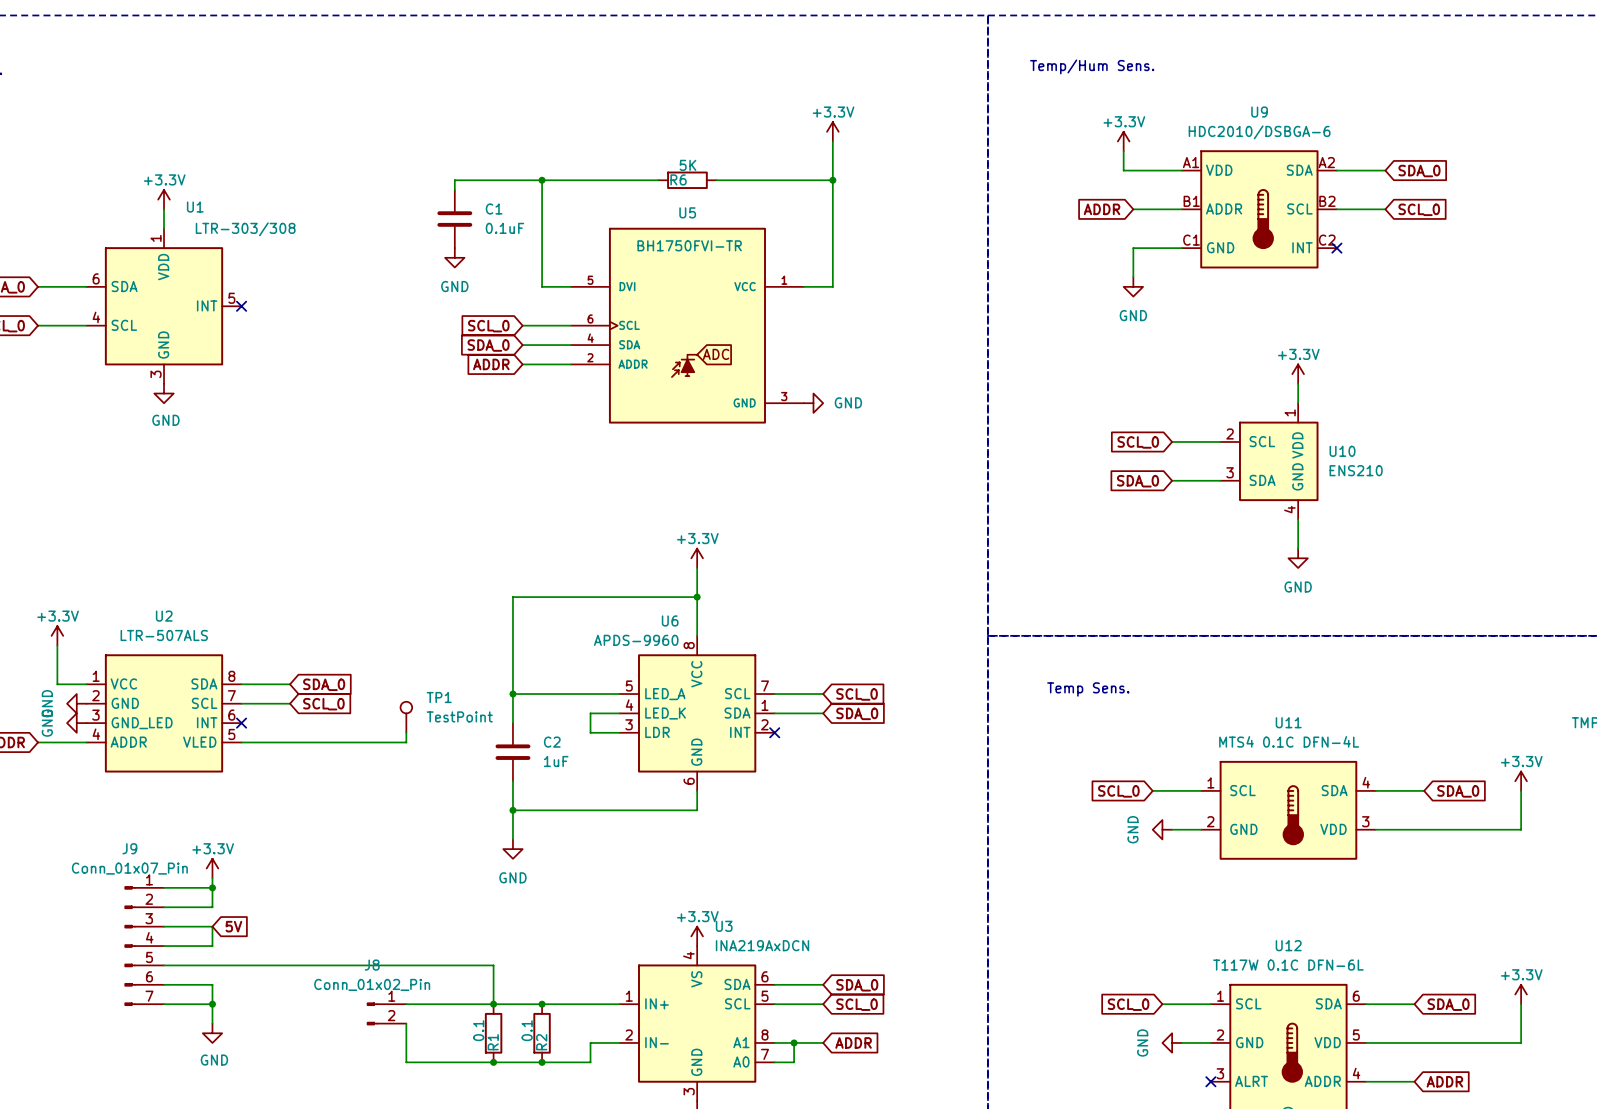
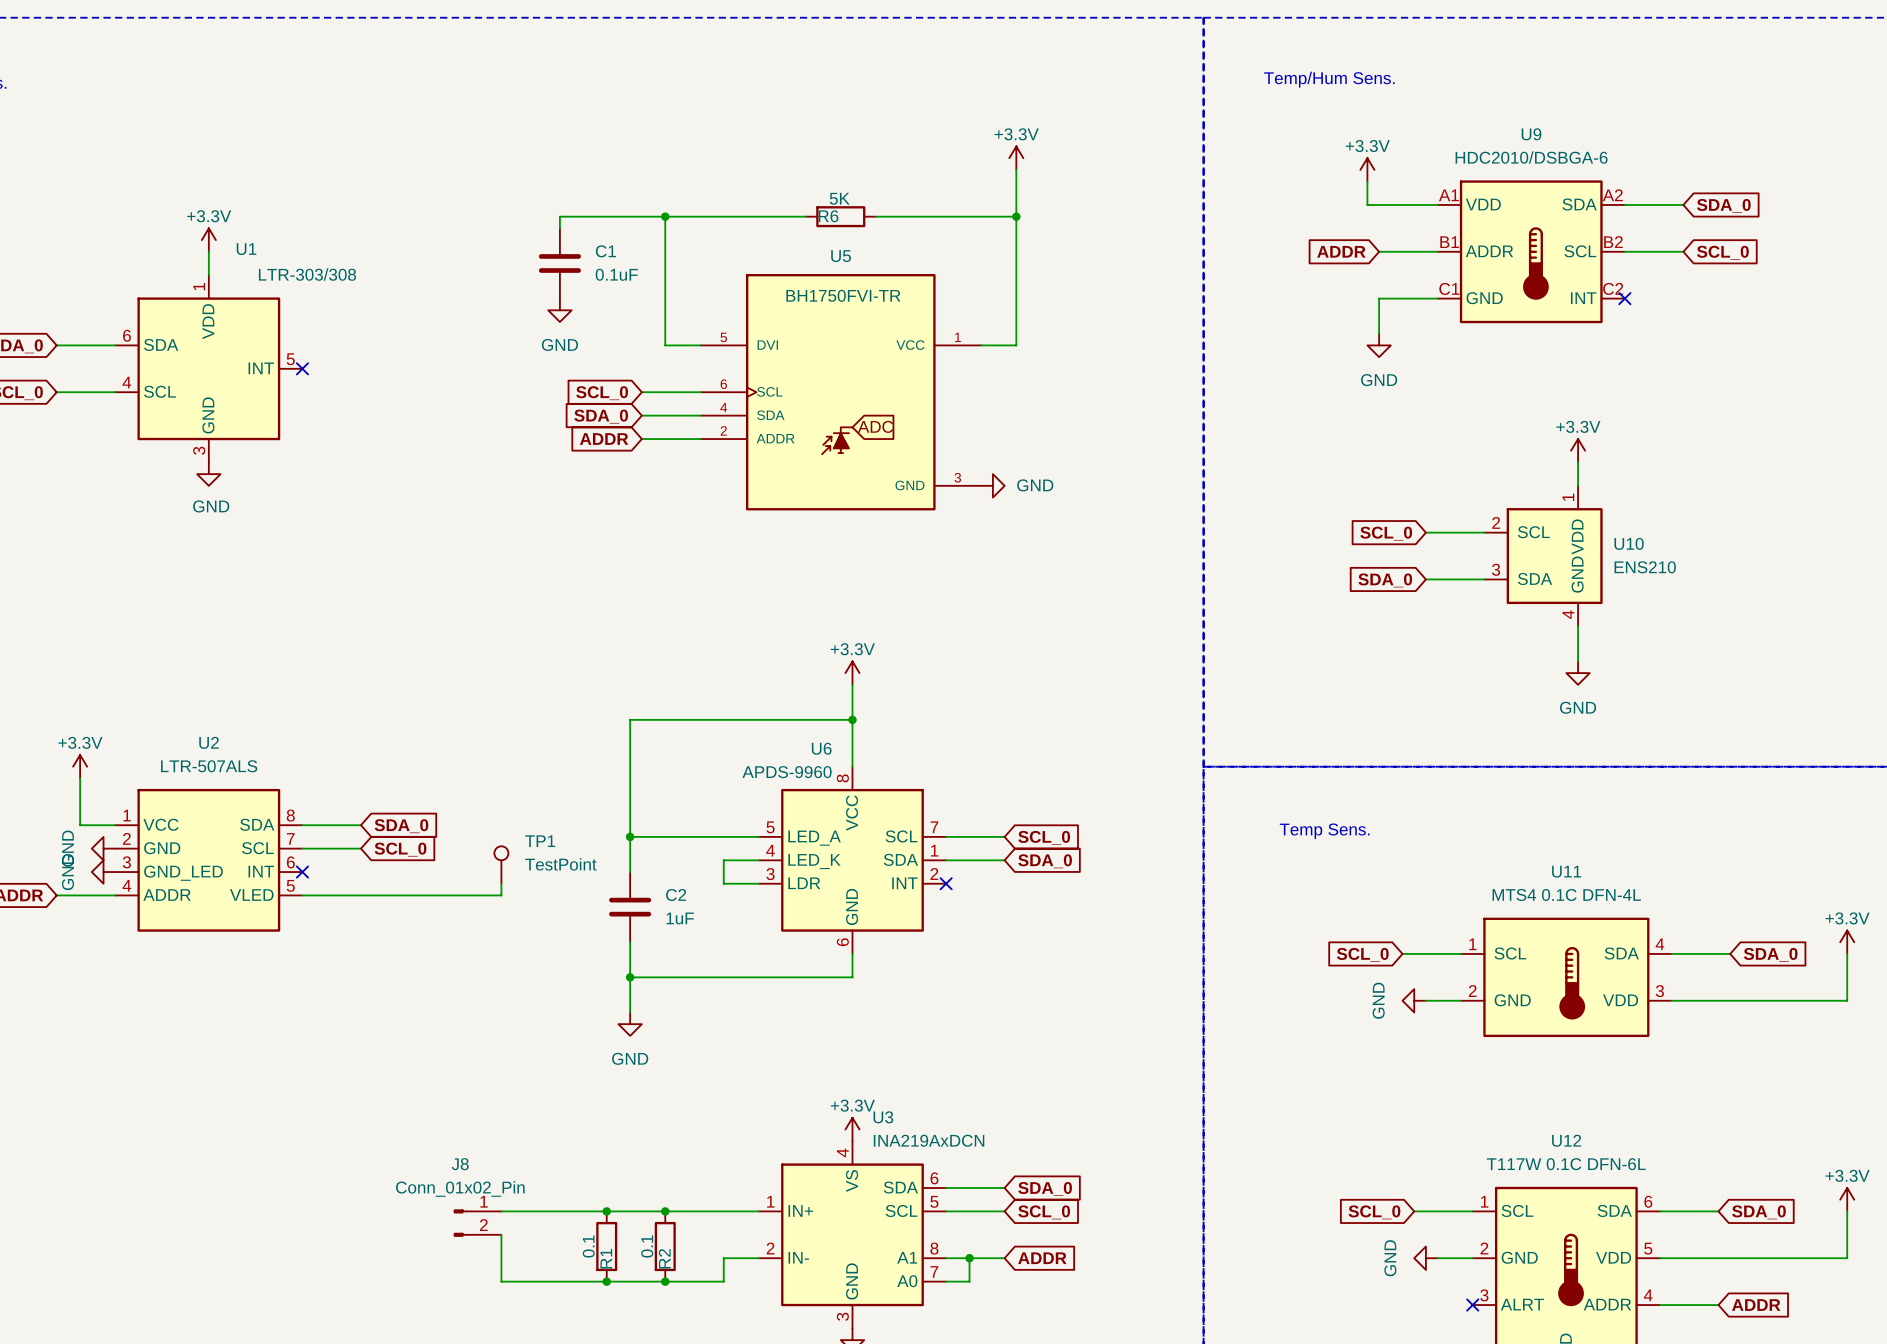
power symbol: +3.3V (212, 868) -> none
wire: (212, 878) (212, 907) (164, 907) -> none
wire: (164, 887) (212, 887) -> none
junction: (212, 887) -> none
wire: (164, 926) (212, 926) (212, 946) (164, 946) -> none
global label: 5V (233, 926) -> none
J9: Conn_01x07_Pin (144, 946) -> none
wire: (164, 965) (493, 965) (493, 1004) -> none
wire: (164, 984) (212, 984) (212, 1023) -> none
wire: (164, 1004) (212, 1004) -> none
junction: (212, 1004) -> none
power symbol: GND (212, 1033) -> none

